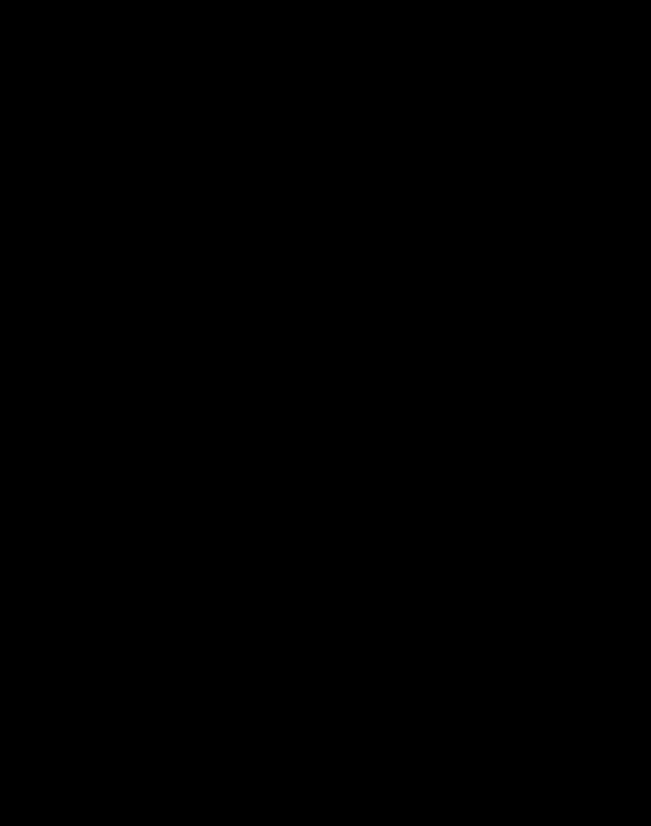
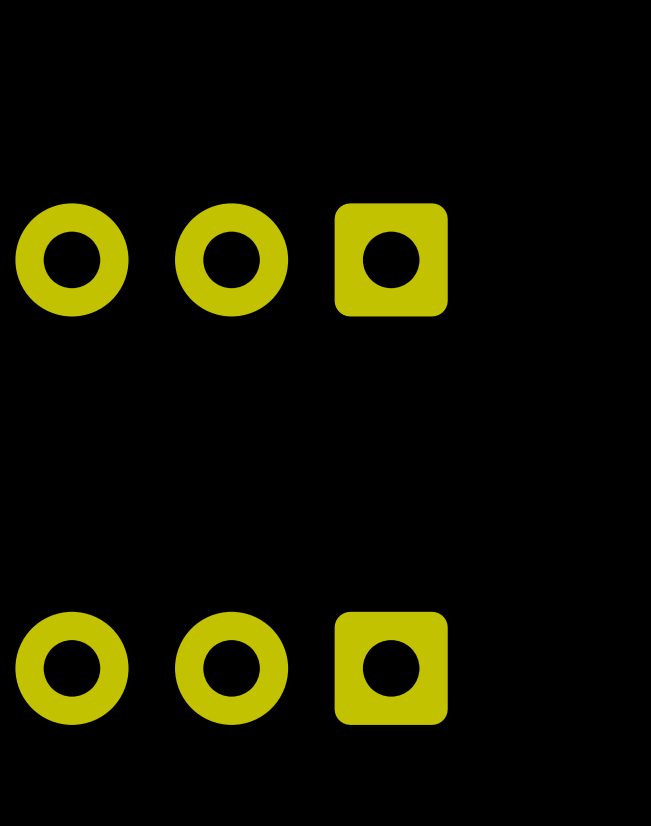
part: none -> (231, 259)
part: none -> (231, 668)

